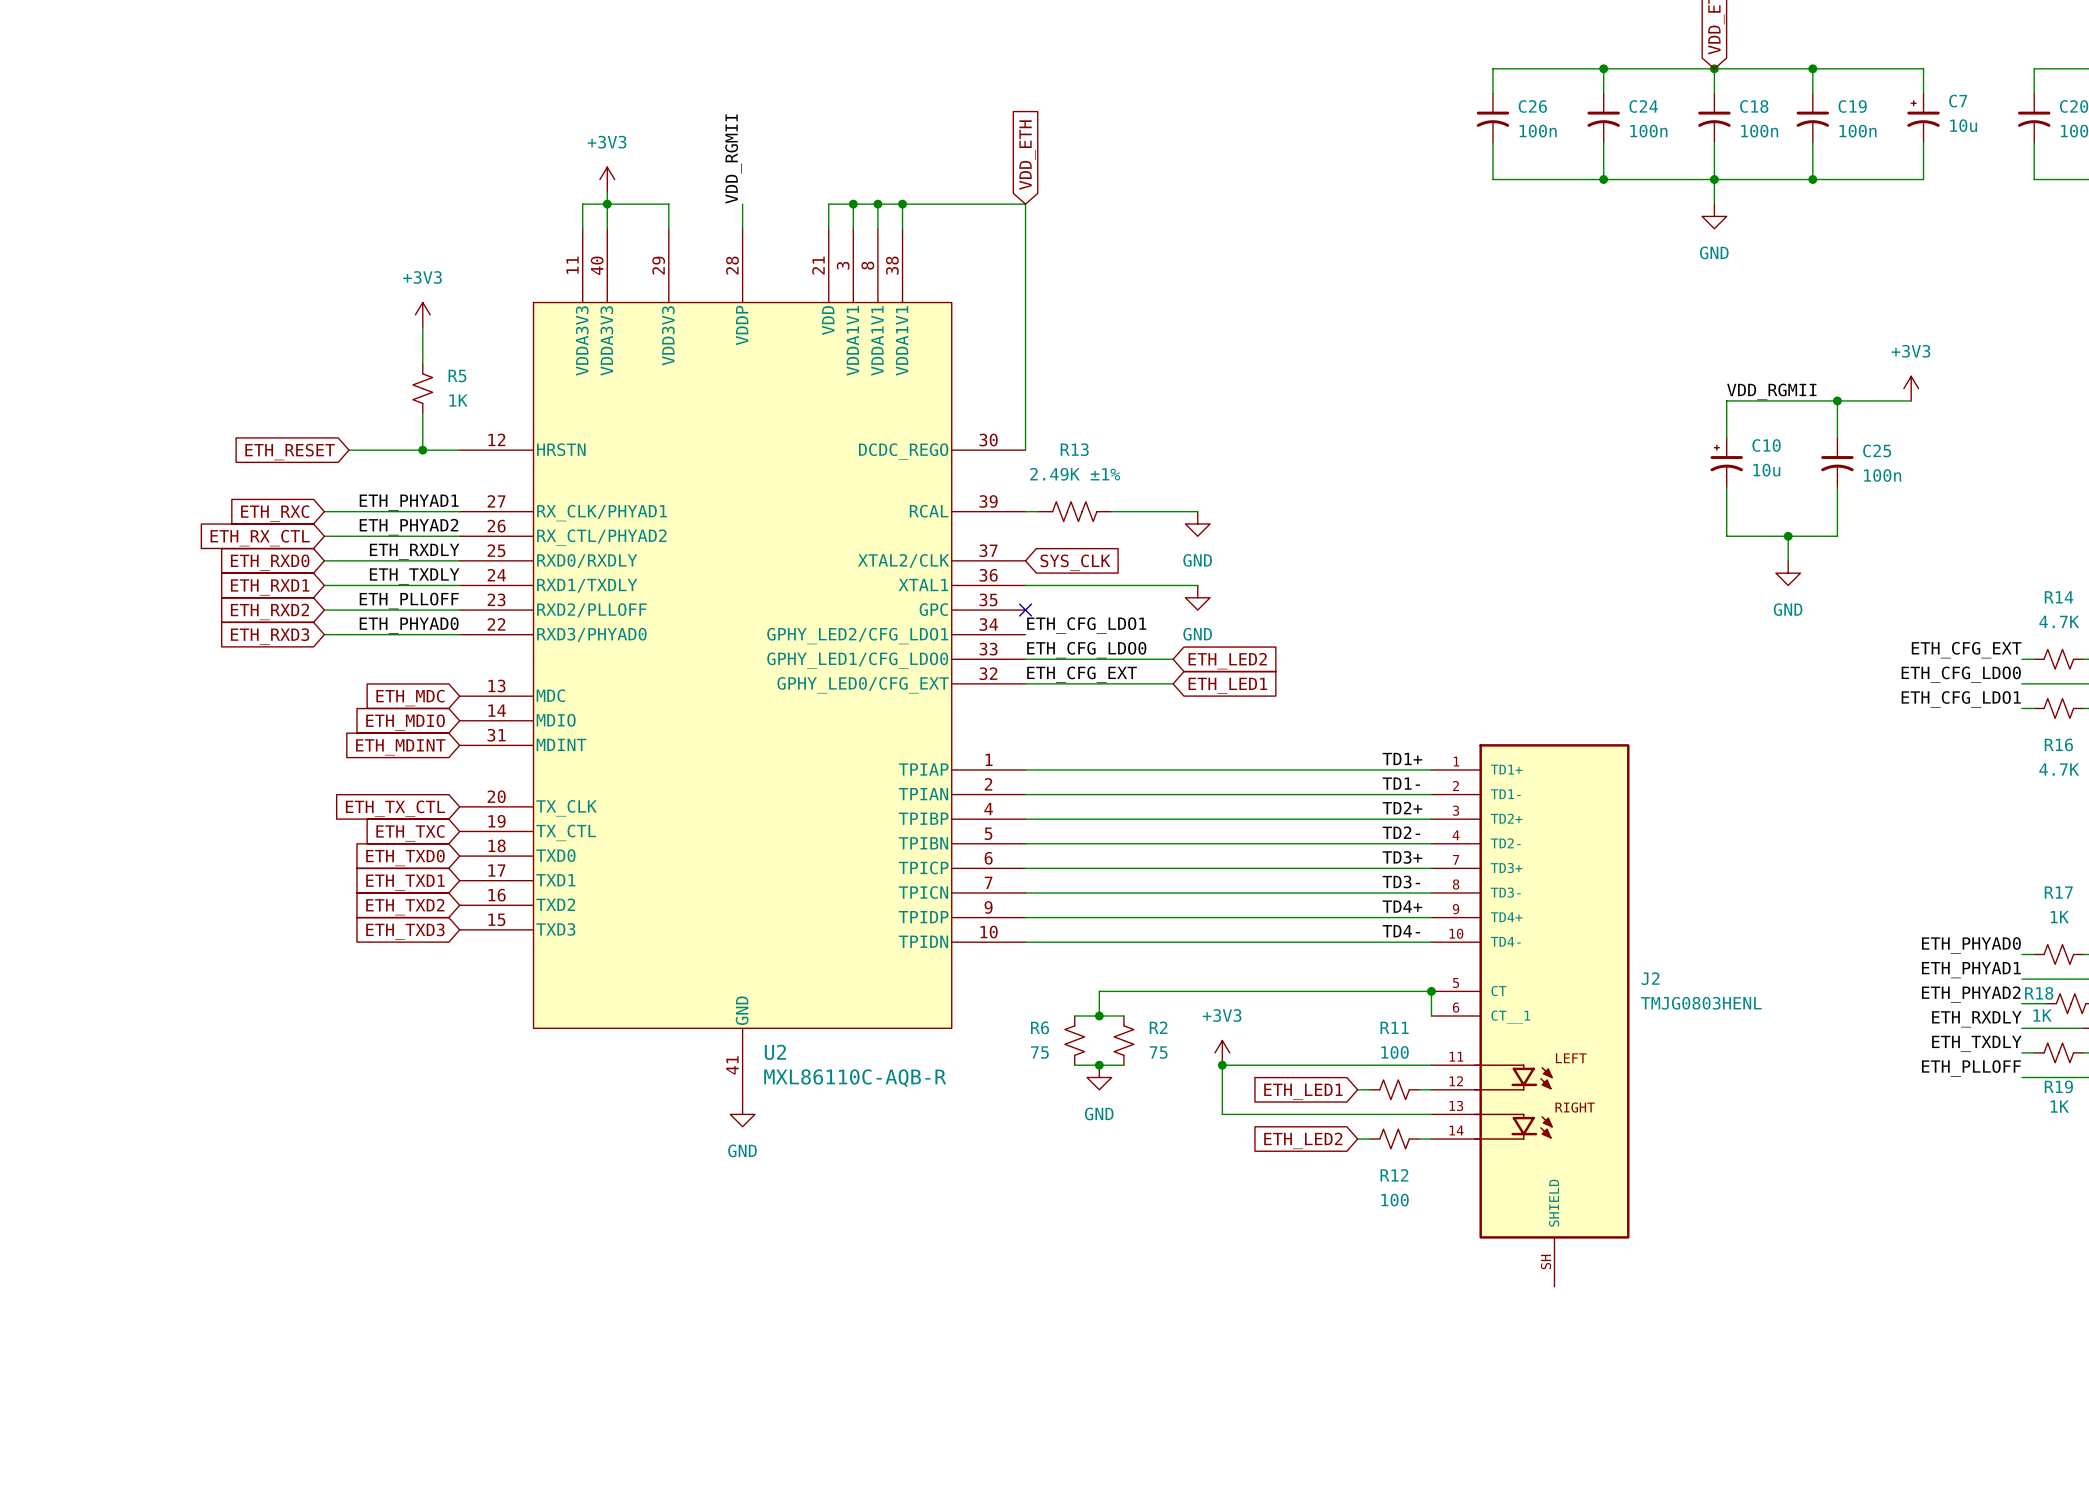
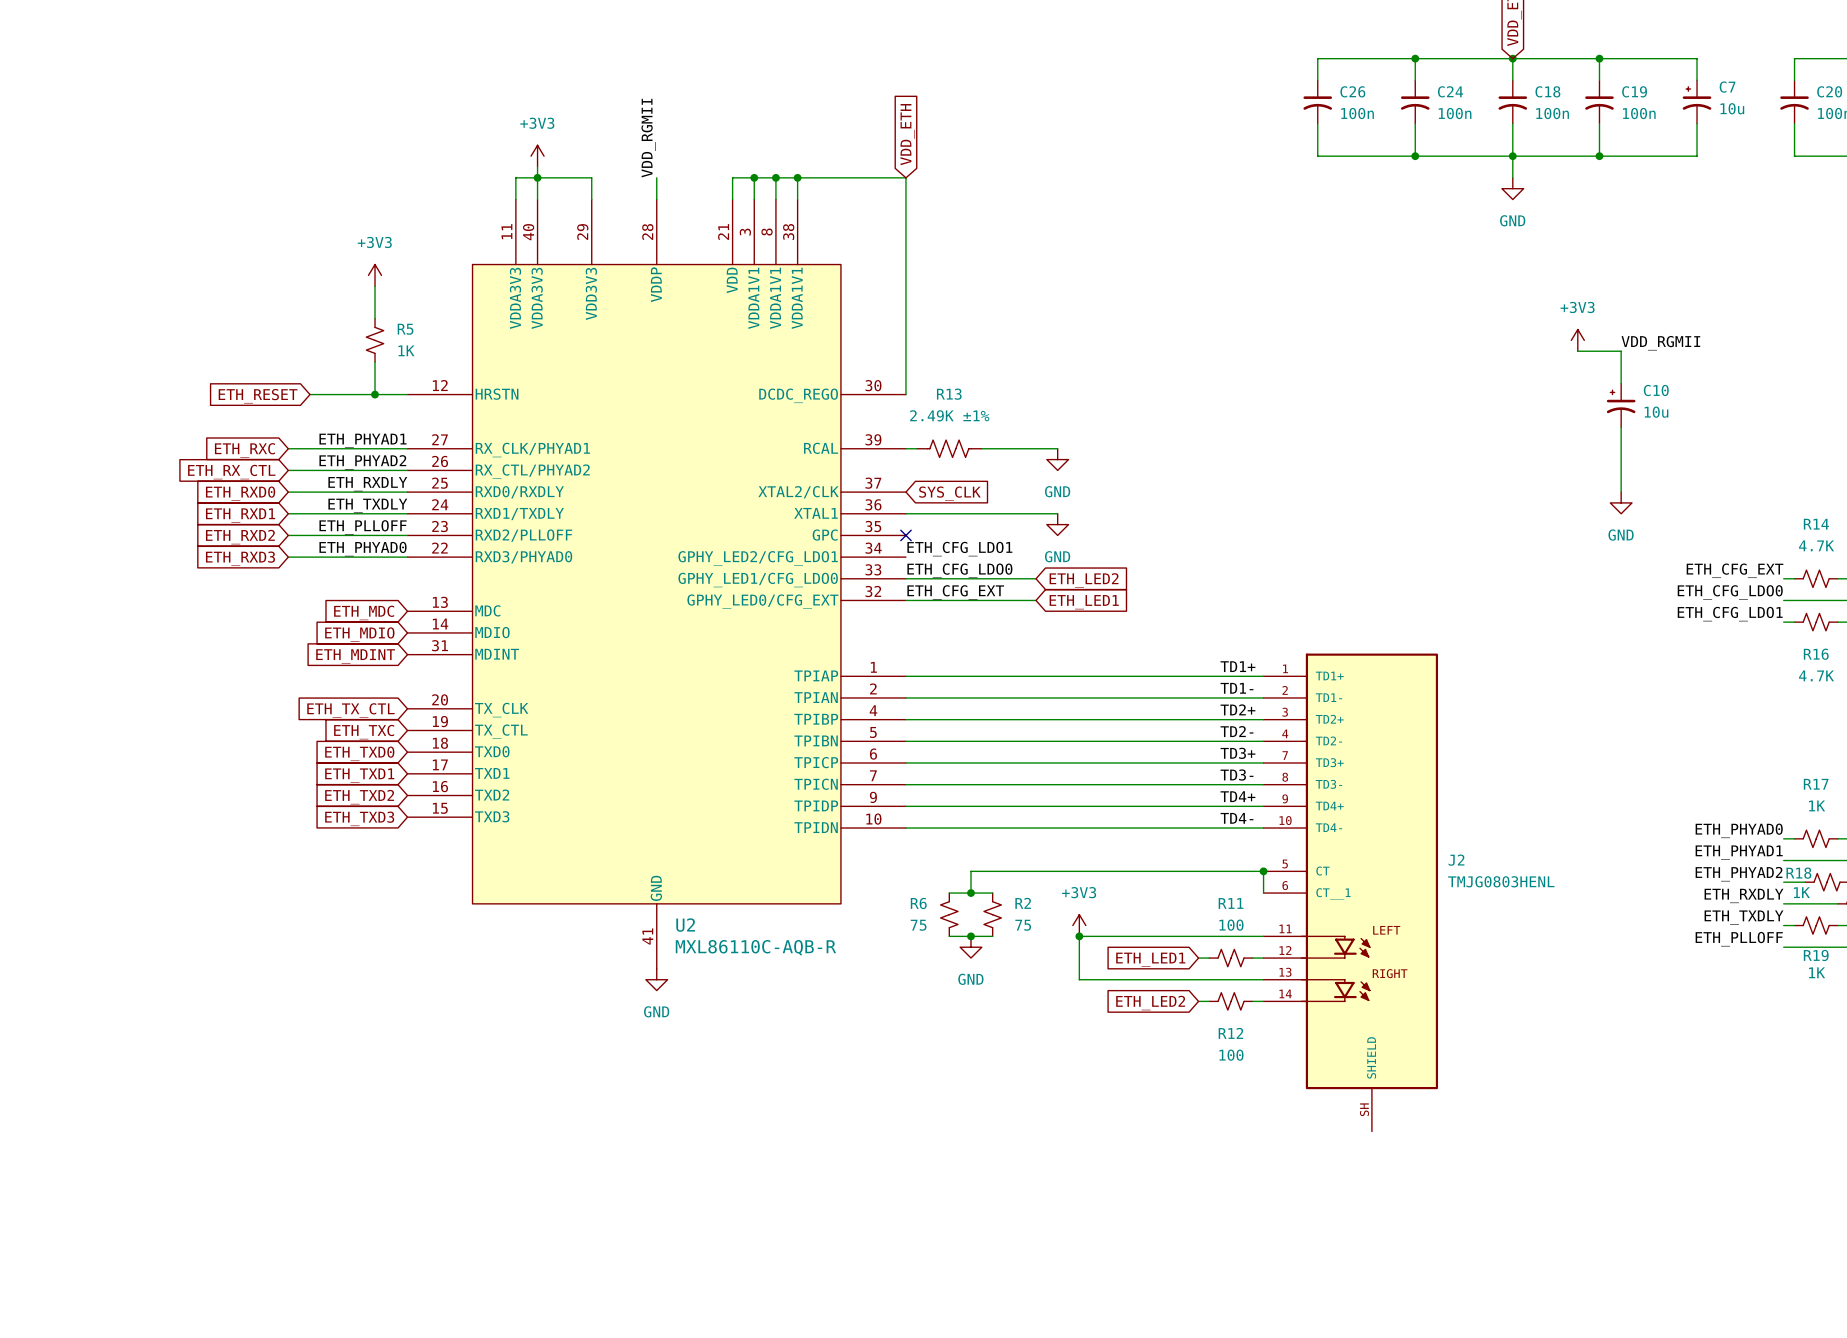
power symbol position: +3V3 (1911, 388) -> +3V3 (1577, 340)
label position: VDD_RGMII (1771, 391) -> VDD_RGMII (1660, 343)
wire: (1788, 400) (1726, 400) (1726, 437) -> none
wire: (1837, 400) (1911, 400) -> none
junction: (1837, 400) -> none
C10 position: (1726, 462) -> (1621, 405)
C25: 100n (1837, 462) -> none
wire: (1726, 487) (1726, 536) (1837, 536) -> (1621, 492) (1621, 470)
wire: (1788, 536) (1788, 560) -> none
junction: (1788, 536) -> none
power symbol position: GND (1788, 573) -> GND (1621, 502)

